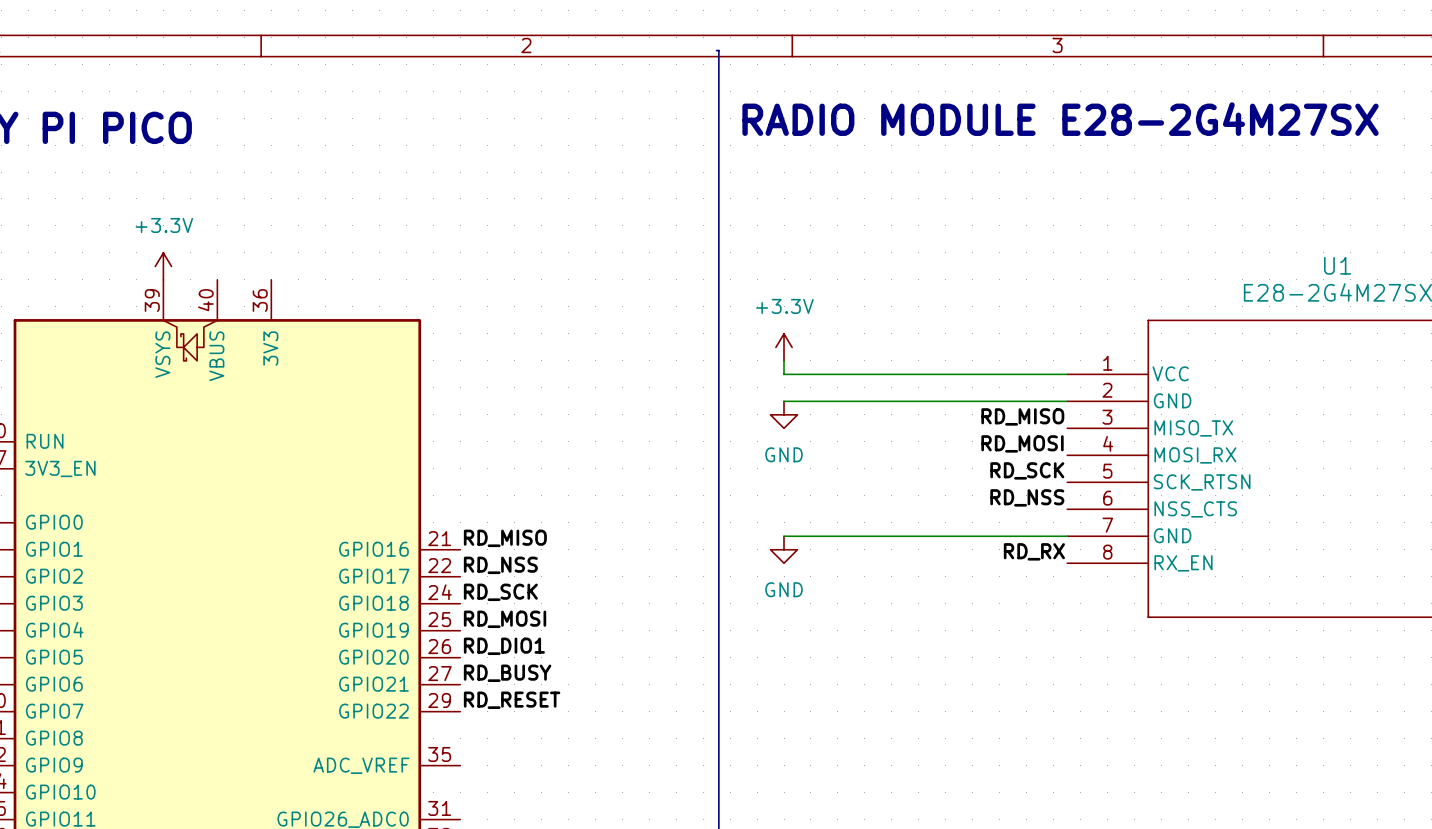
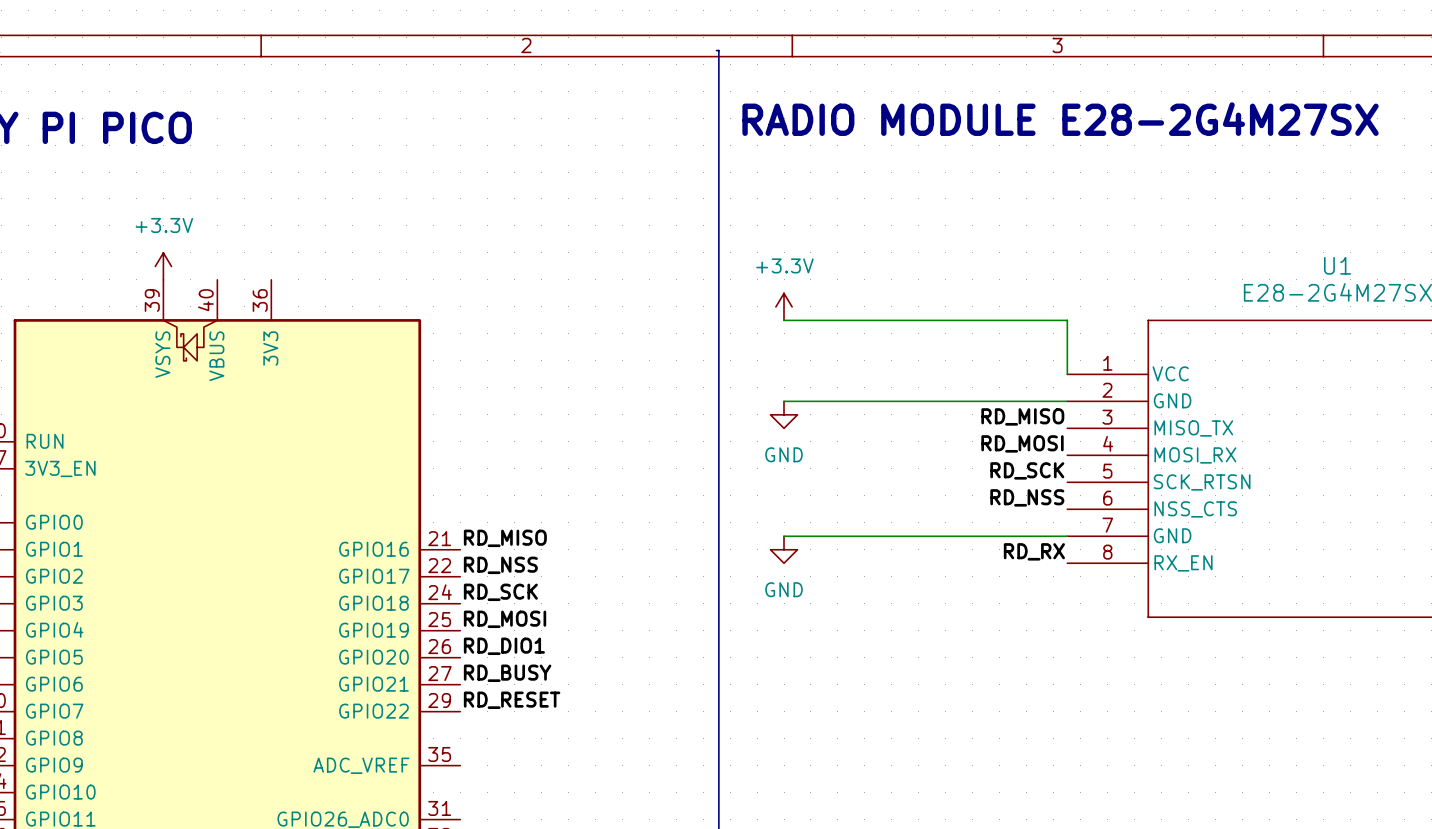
power symbol position: +3.3V (784, 347) -> +3.3V (784, 306)
wire: (784, 360) (784, 374) (1067, 374) -> (784, 320) (1067, 320) (1067, 374)

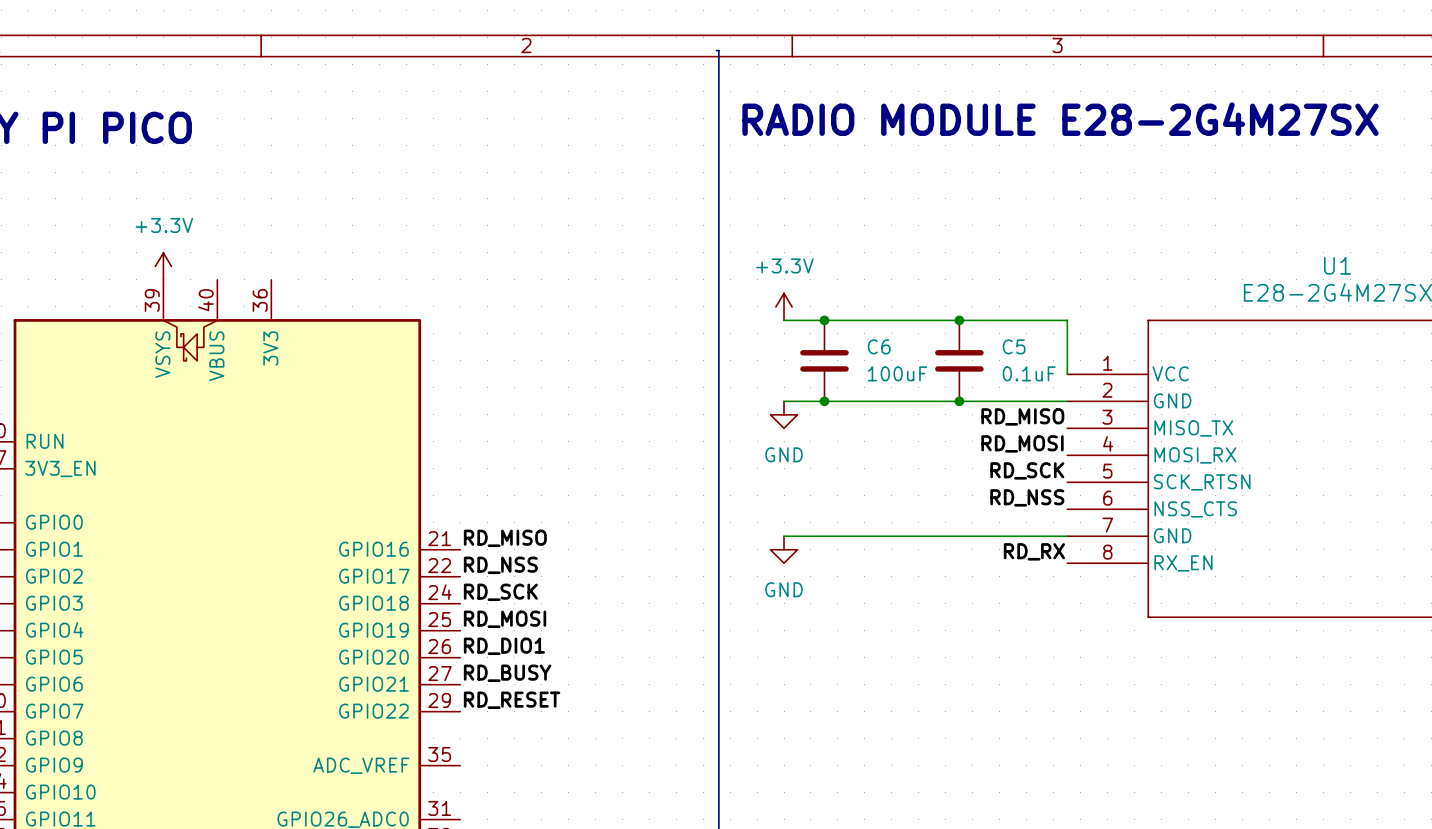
junction: none -> (824, 320)
junction: none -> (959, 320)
C6: none -> 100uF (824, 360)
C5: none -> 0.1uF (959, 360)
junction: none -> (824, 401)
junction: none -> (959, 401)

